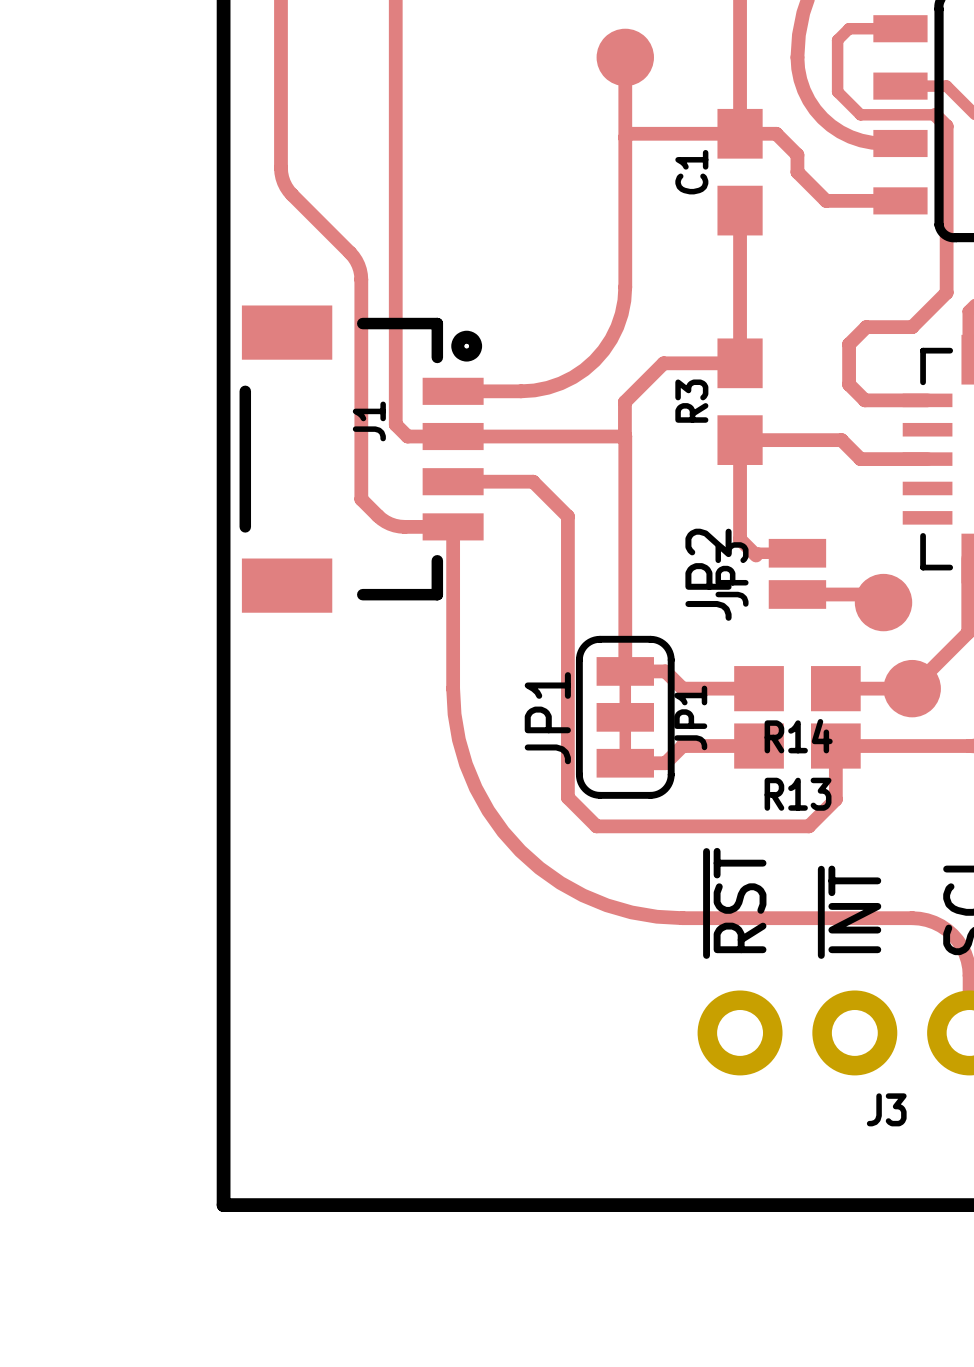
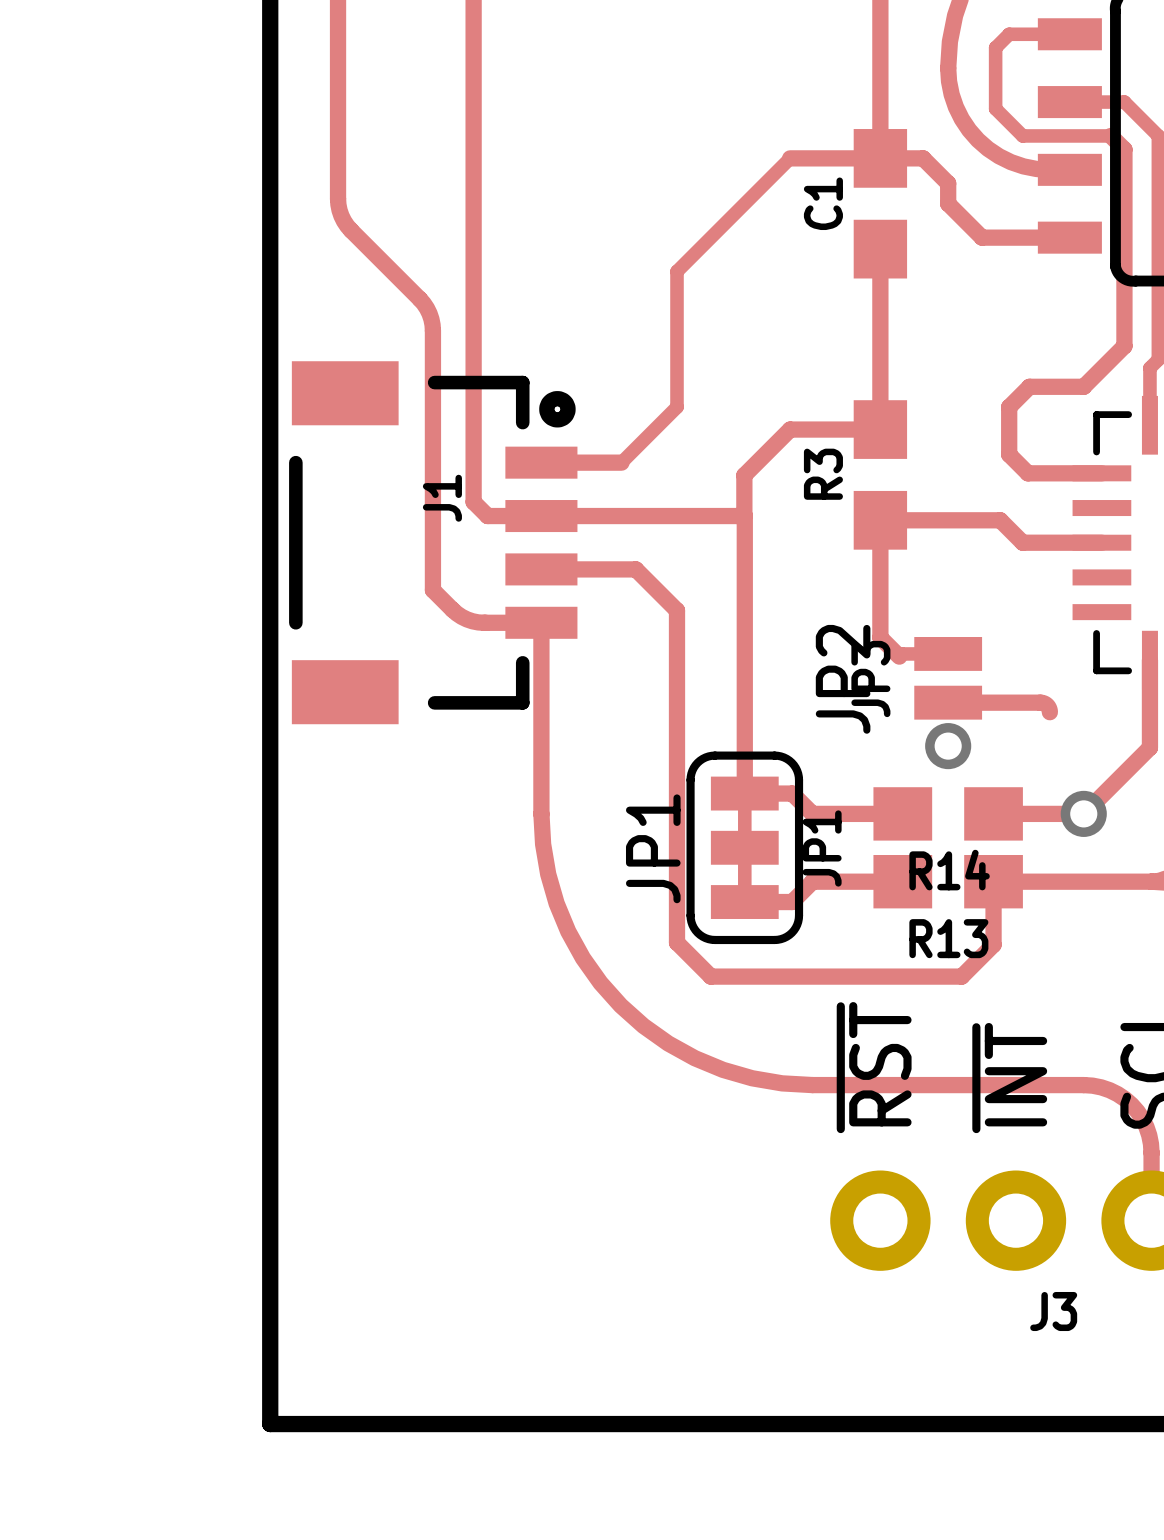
track: (625, 57) (625, 286) (621, 313) (611, 339) (594, 360) (584, 369) (560, 383) (547, 387) (520, 391) -> (790, 158) (677, 271) (677, 407) (621, 462)
part: (625, 57) -> none
track: (663, 133) (628, 133) (625, 137) -> none
part: (883, 602) -> none
via: none -> (948, 746)
part: (912, 688) -> none
via: none -> (1083, 813)

